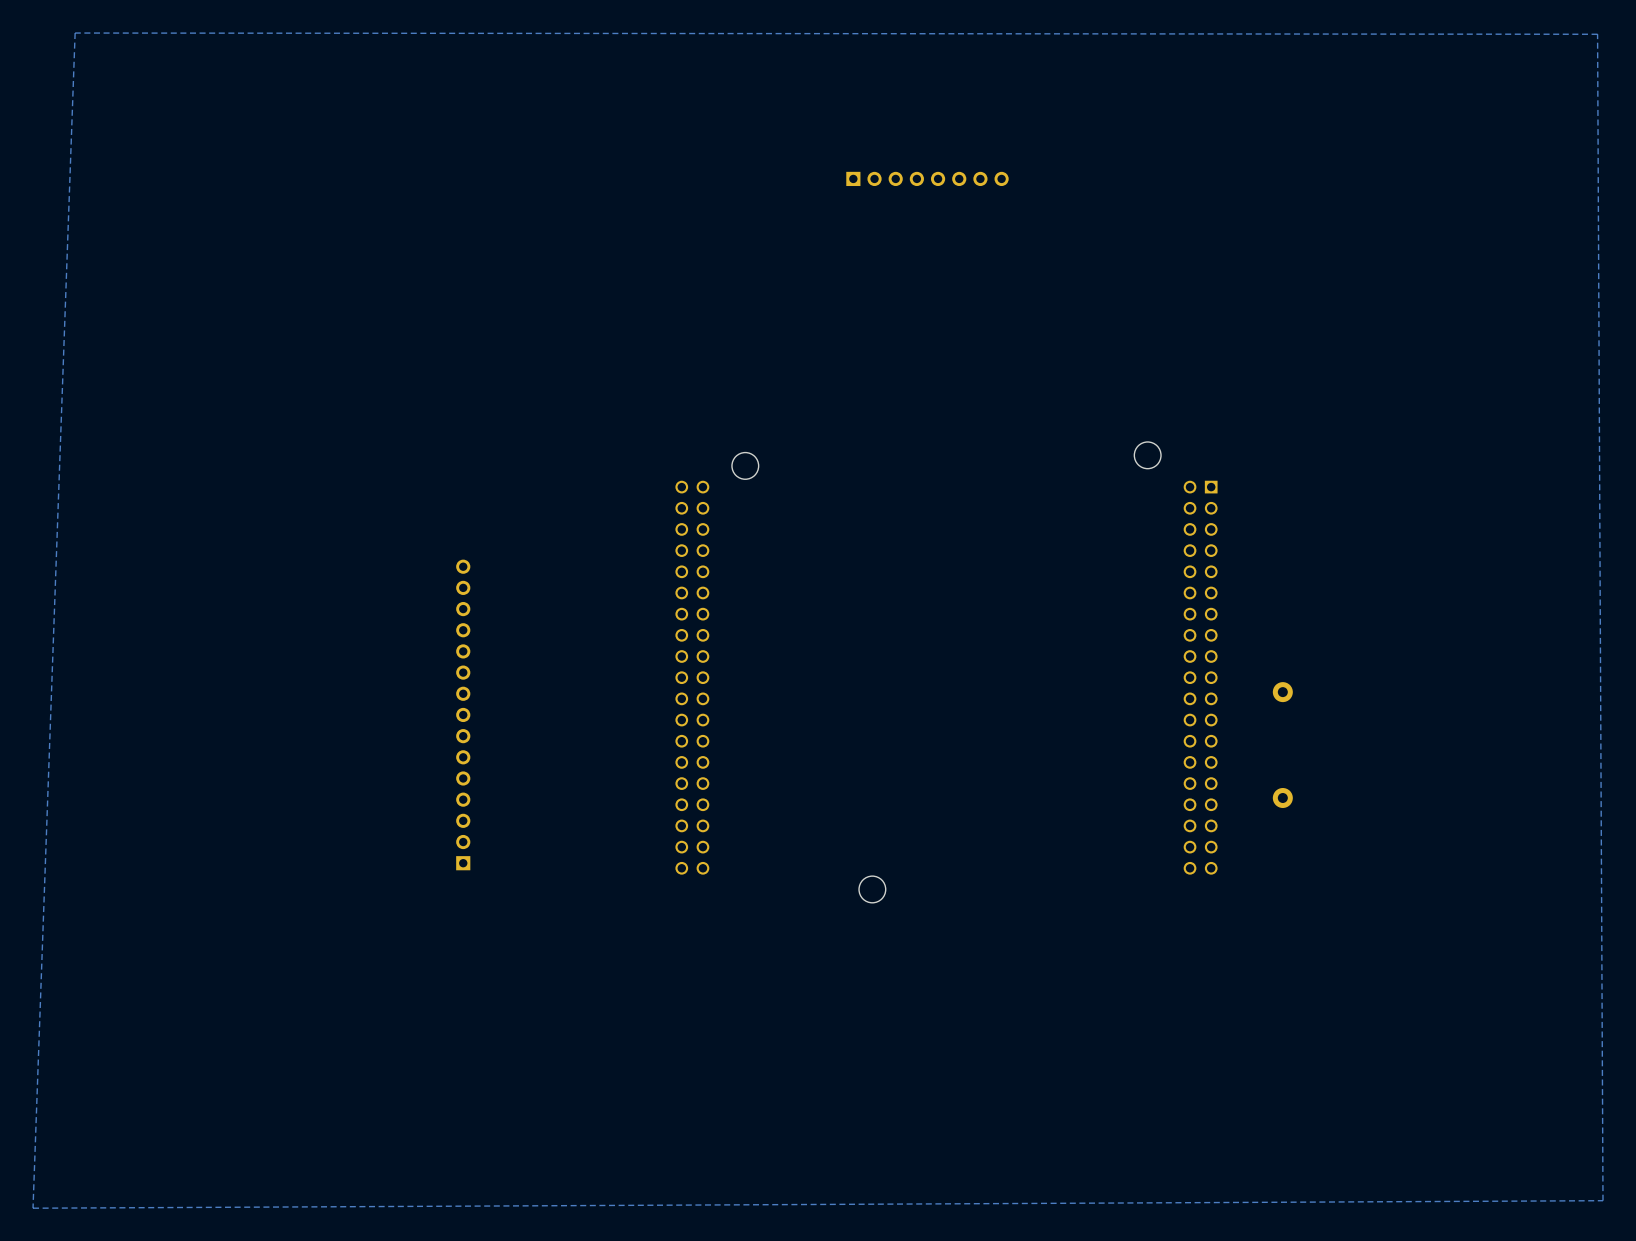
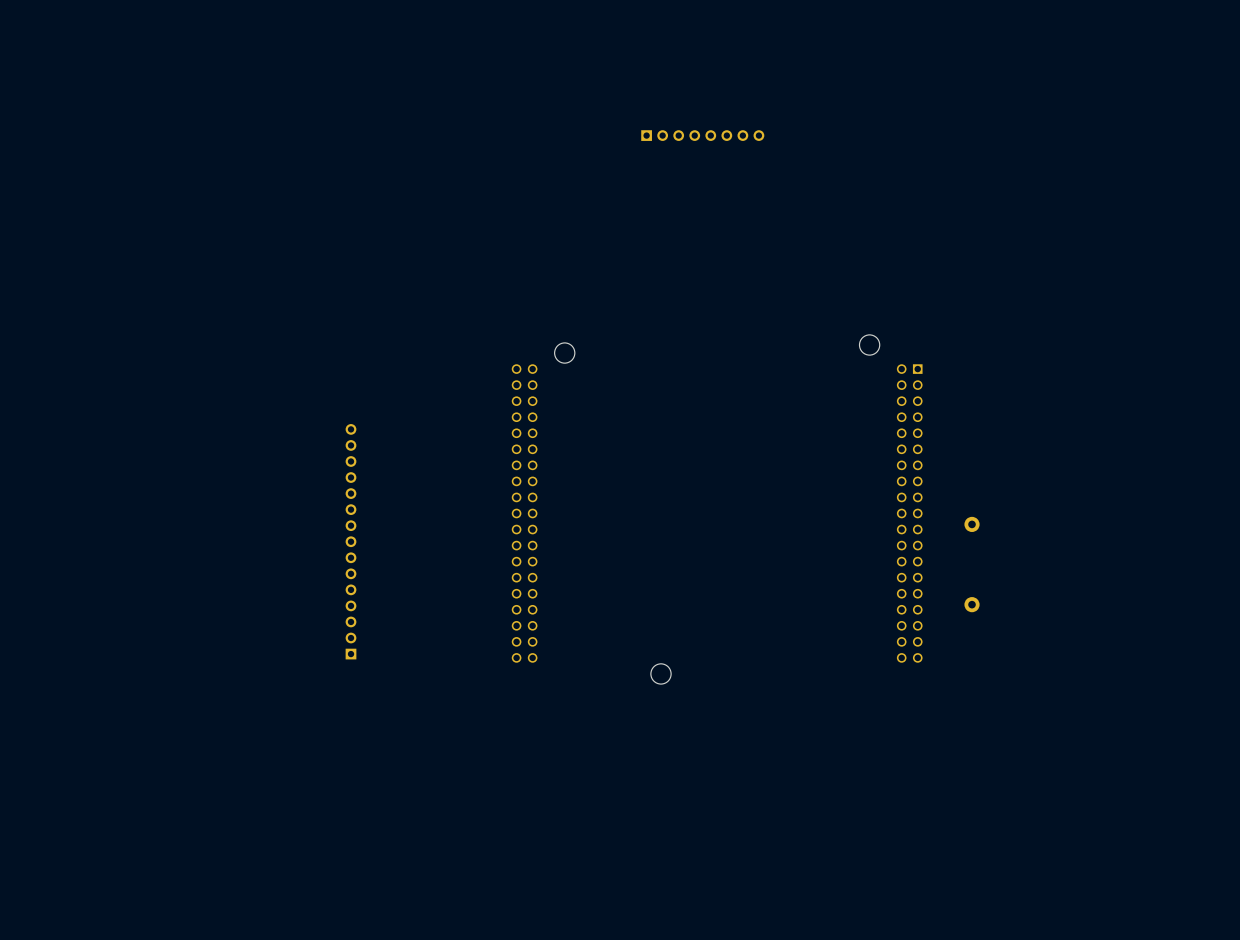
zone outline: (75, 33) (1597, 34) (1602, 1200) (33, 1208) (75, 33) -> none

